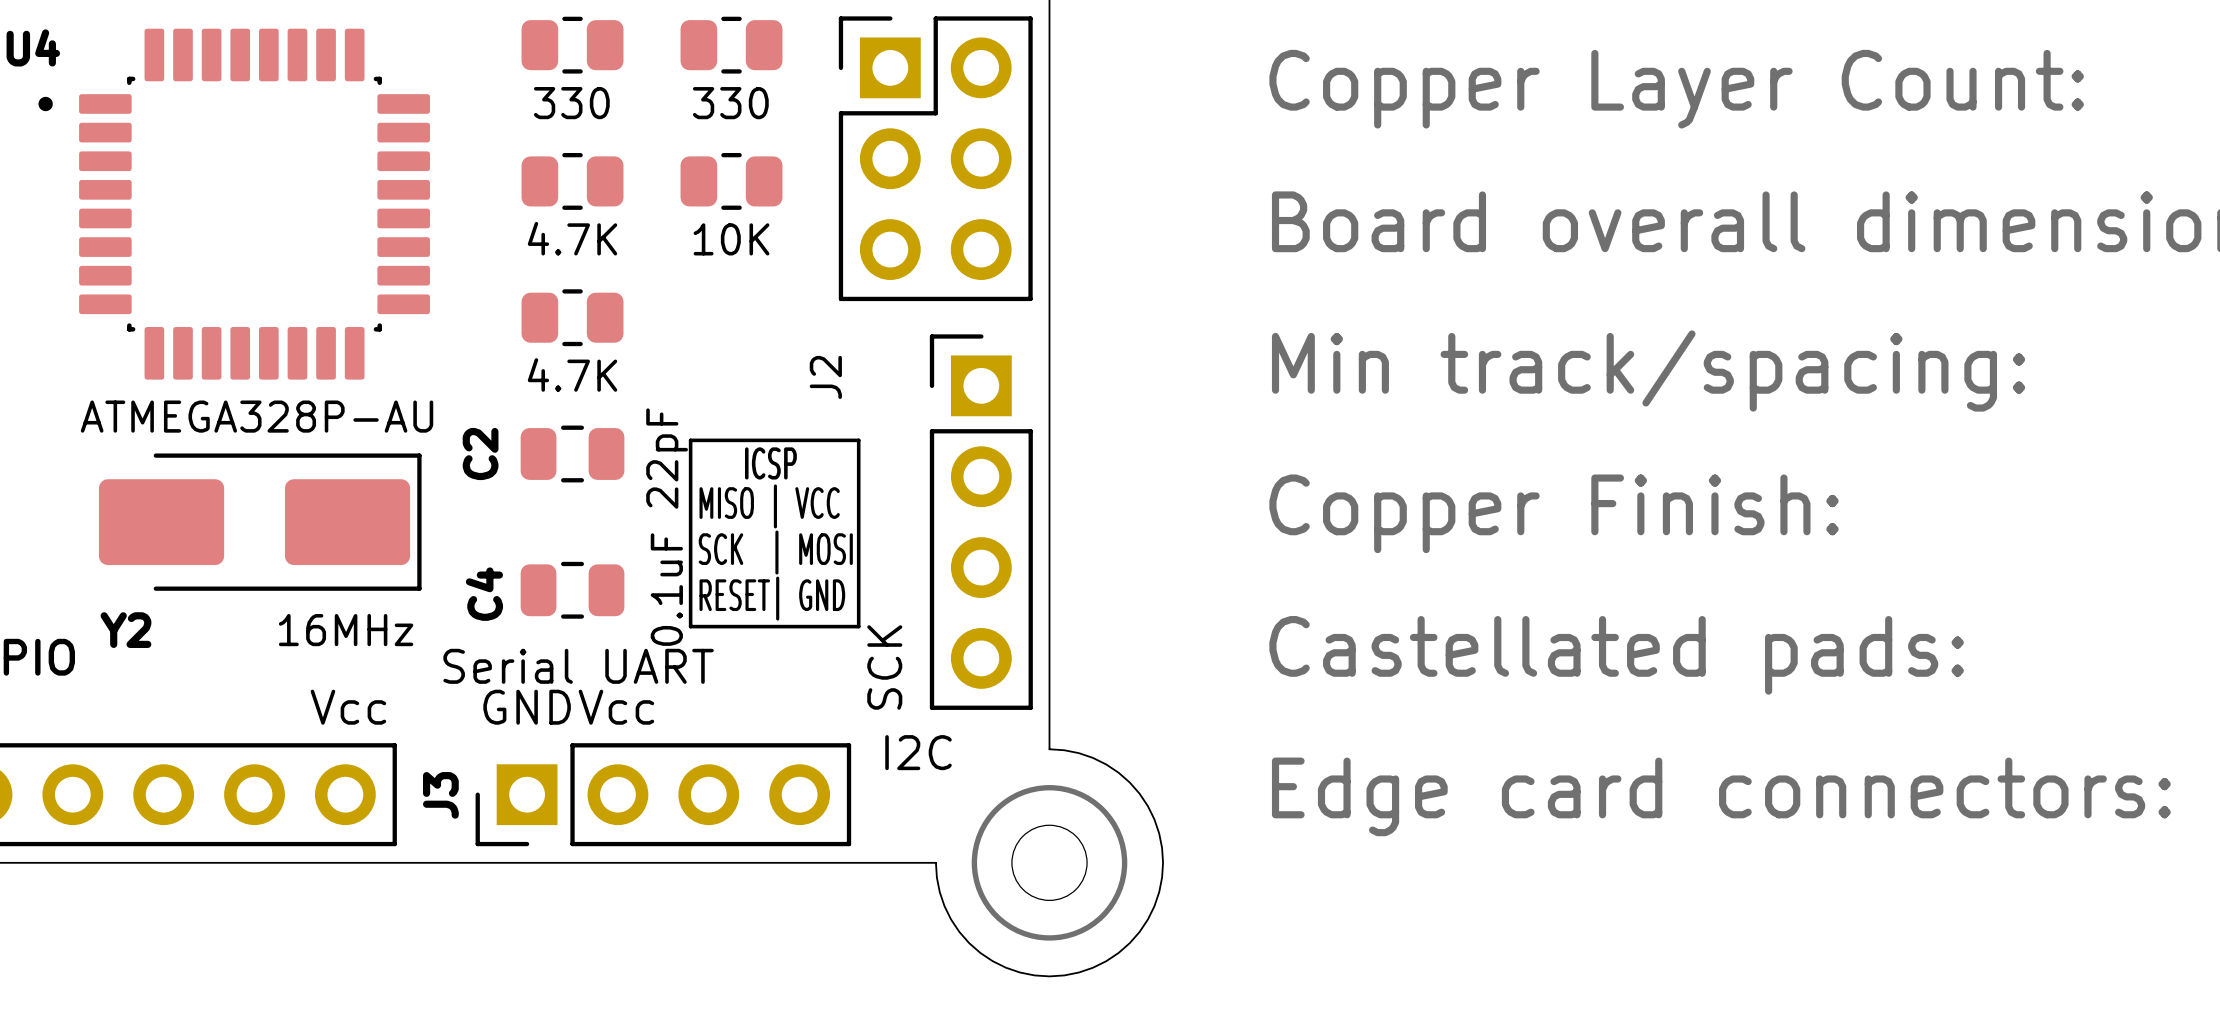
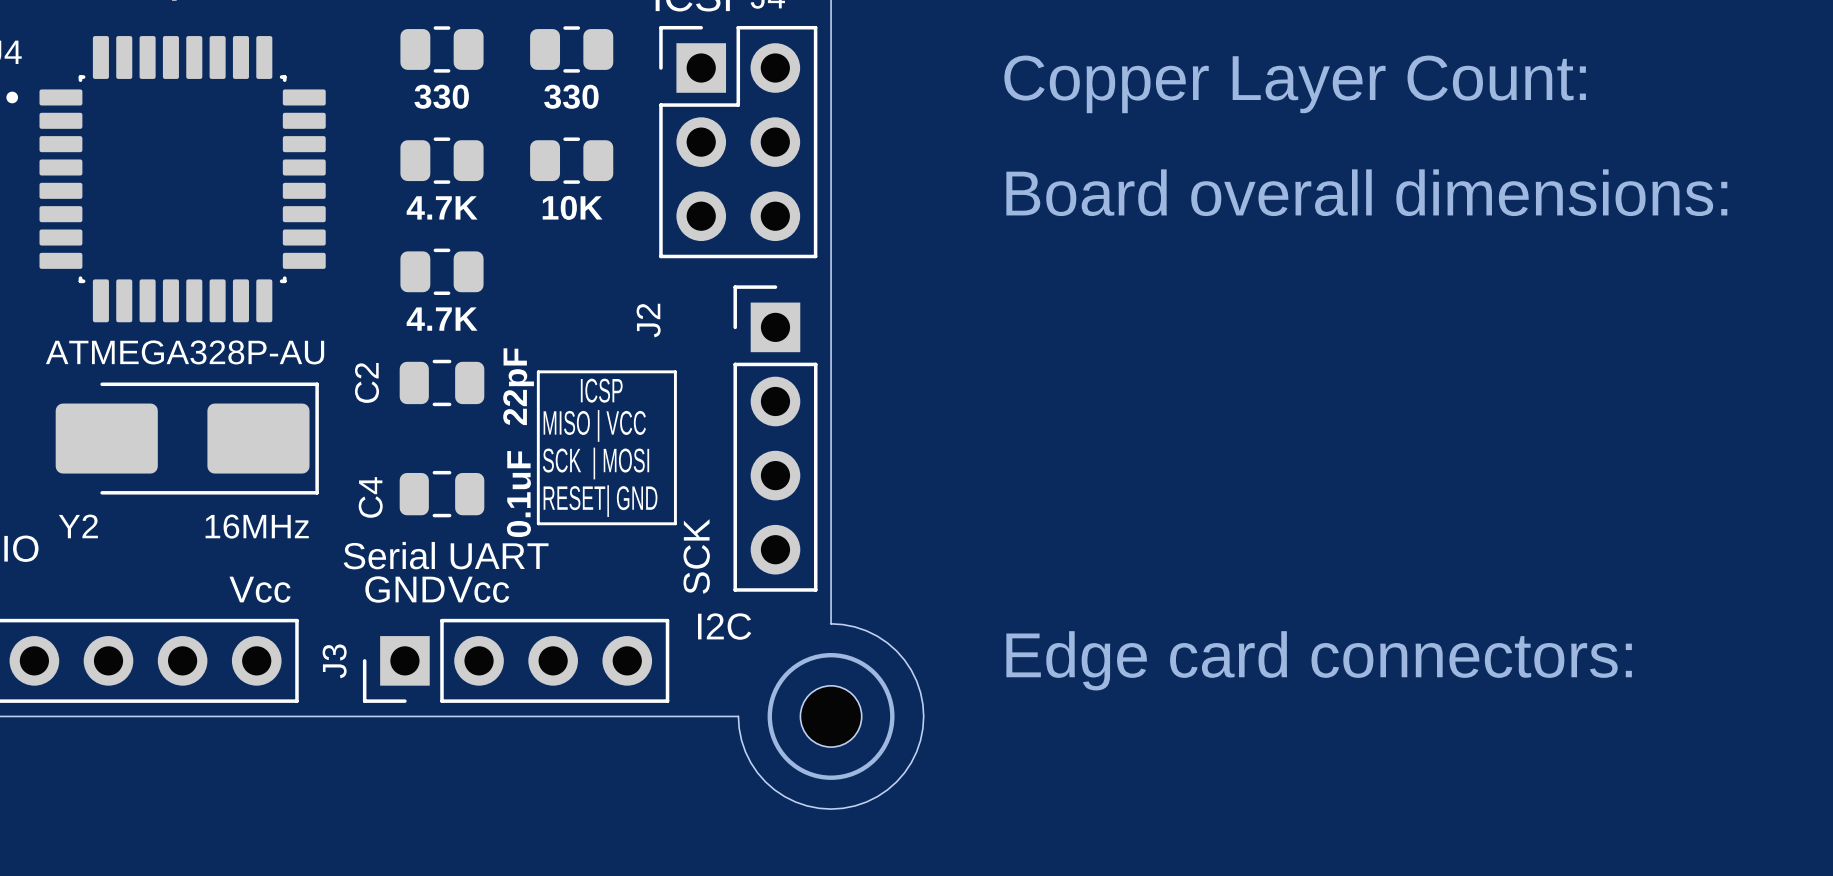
text: Min track/spacing: (1648, 371) -> none
text: Copper Finish: (1553, 513) -> none
text: Castellated pads: (1616, 655) -> none

